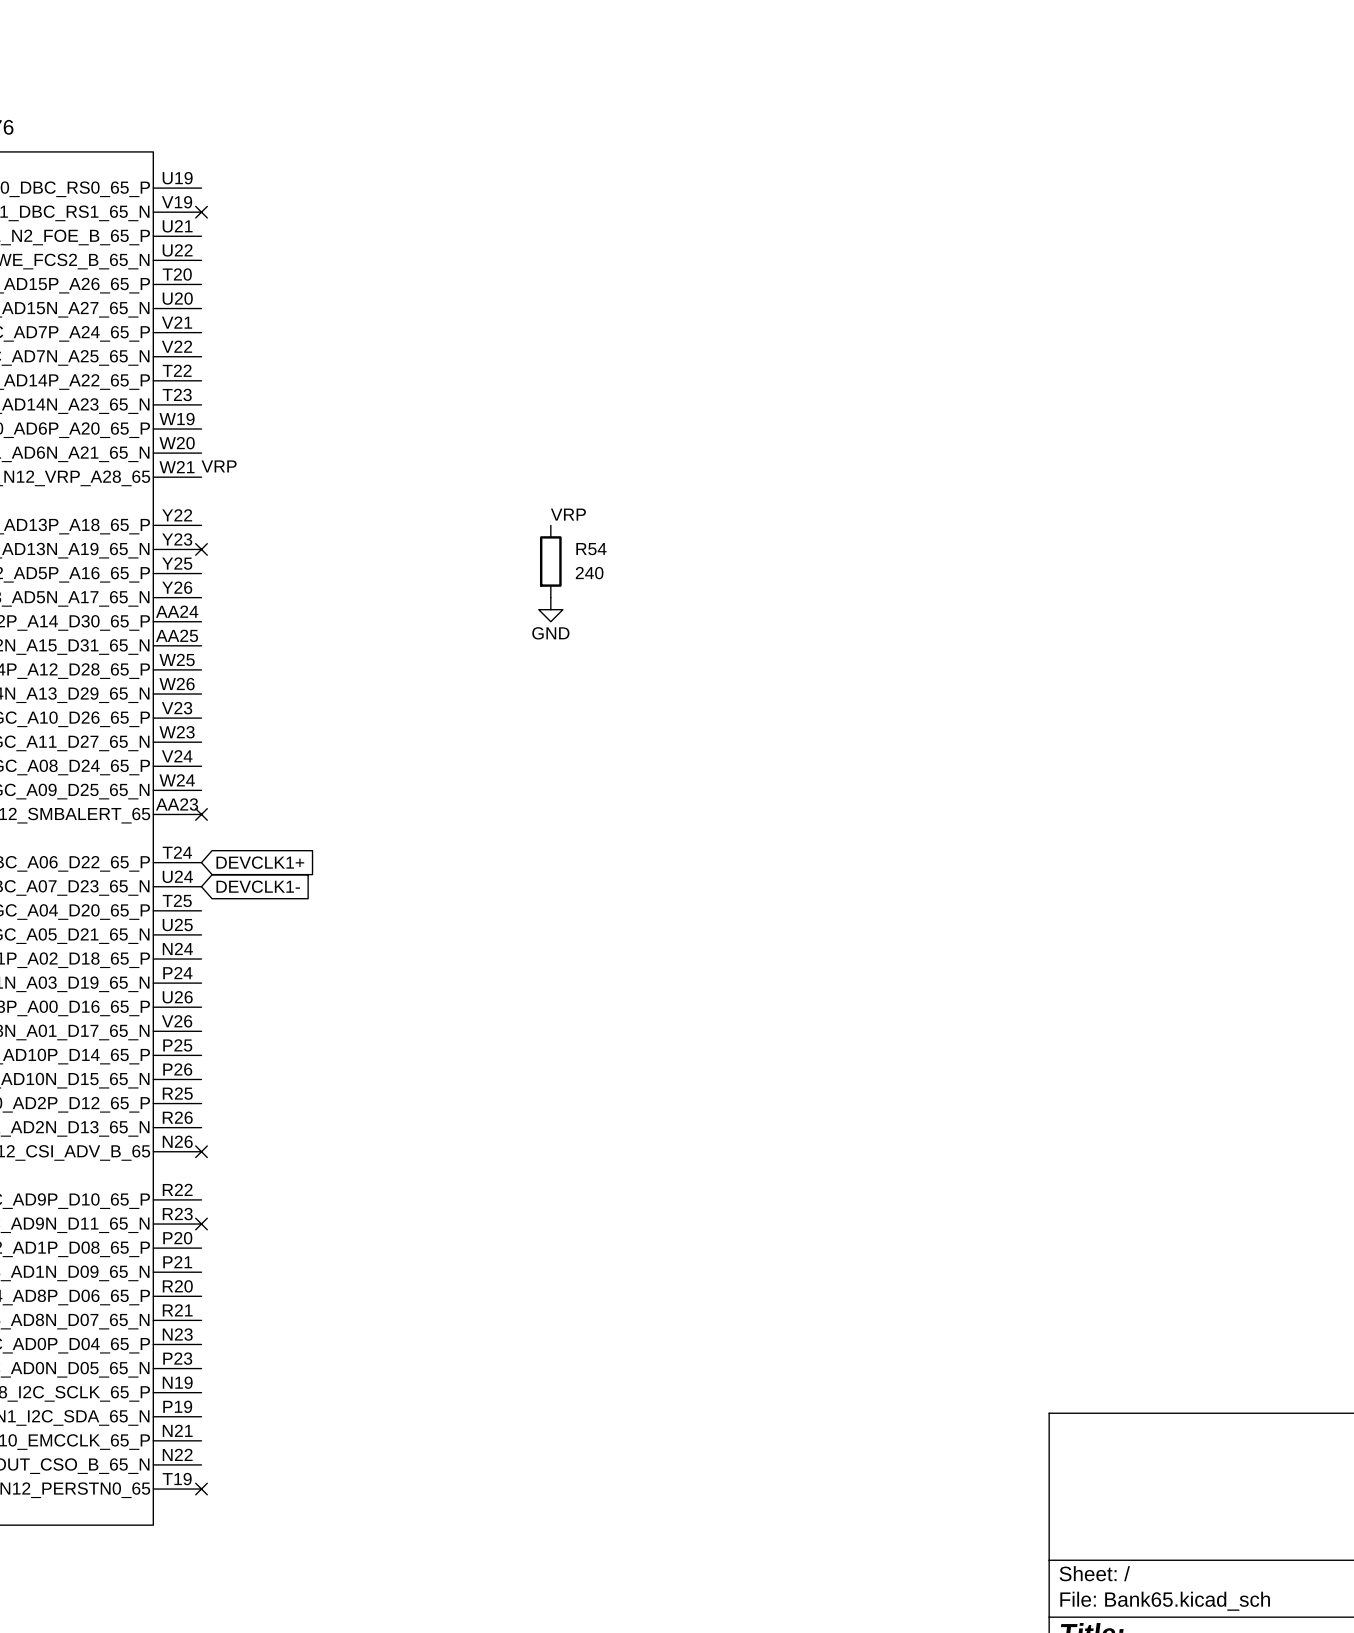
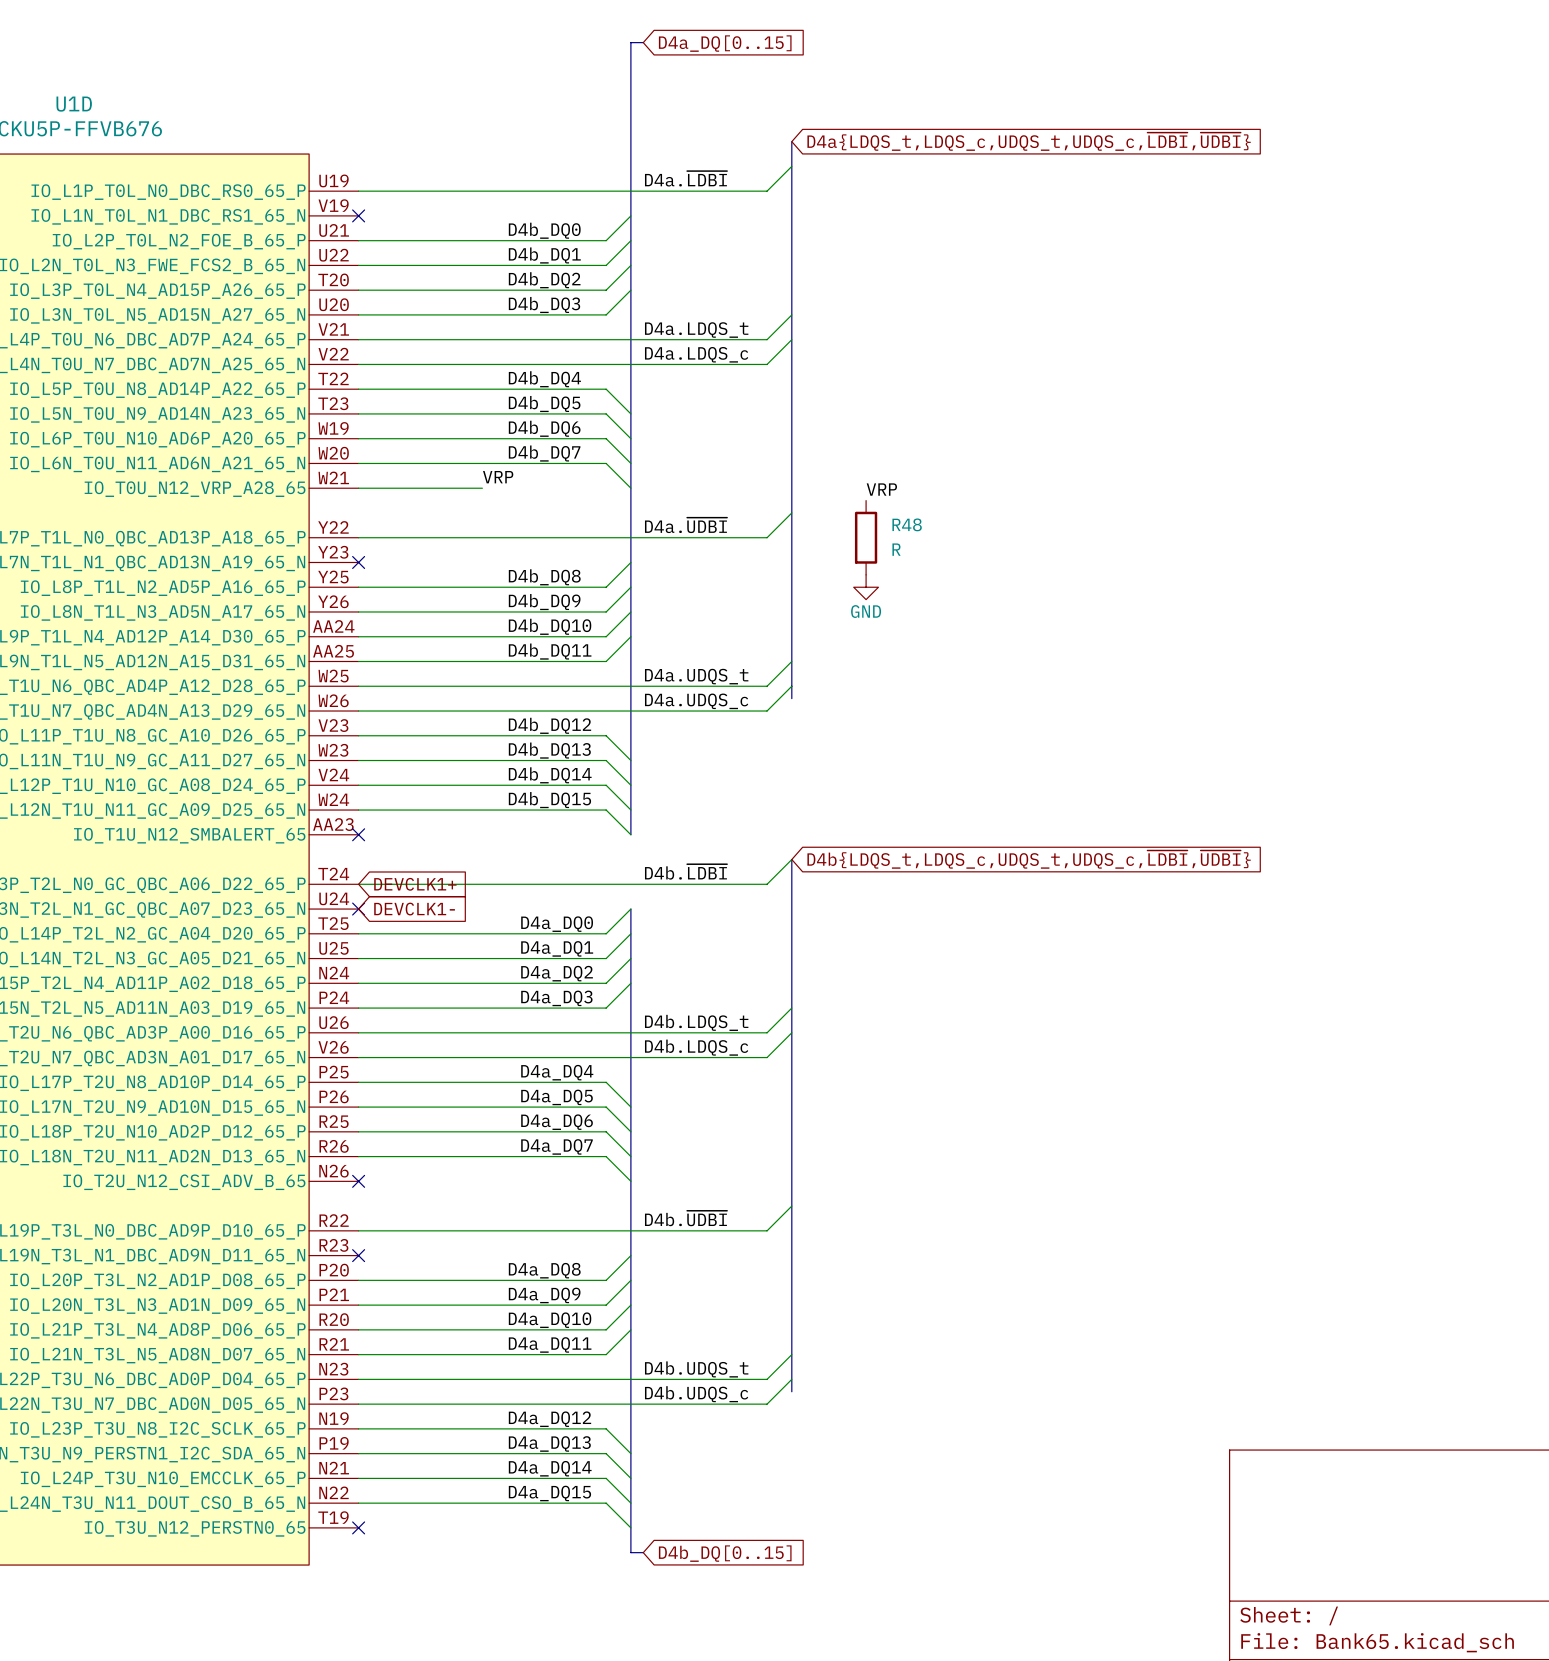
bus: none -> (643, 42) (630, 42) (630, 834)
global label: none -> D4a_DQ[0..15] (725, 43)
bus: none -> (791, 141) (791, 698)
global label: none -> D4a{LDQS_t,LDQS_c,UDQS_t,UDQS_c,~{LDBI},~{UDBI}} (1029, 141)
wire: none -> (791, 166) (767, 191) (358, 191)
label: none -> D4a.~{LDBI} (686, 178)
wire: none -> (630, 215) (606, 240) (358, 240)
label: none -> D4b_DQ0 (544, 230)
wire: none -> (630, 240) (606, 265) (358, 265)
label: none -> D4b_DQ1 (544, 255)
wire: none -> (630, 265) (606, 290) (358, 290)
label: none -> D4b_DQ2 (544, 280)
wire: none -> (630, 290) (606, 314) (358, 314)
label: none -> D4b_DQ3 (544, 305)
wire: none -> (791, 314) (767, 339) (358, 339)
label: none -> D4a.LDQS_t (696, 330)
wire: none -> (791, 339) (767, 364) (358, 364)
label: none -> D4a.LDQS_c (696, 354)
label: none -> D4b_DQ4 (544, 379)
wire: none -> (358, 389) (606, 389) (630, 413)
label: none -> D4b_DQ5 (544, 404)
wire: none -> (358, 413) (606, 413) (630, 438)
label: none -> D4b_DQ6 (544, 428)
wire: none -> (358, 438) (606, 438) (630, 463)
label: none -> D4b_DQ7 (544, 453)
wire: none -> (358, 463) (606, 463) (630, 488)
label: VRP (219, 466) -> none
label: none -> VRP (498, 477)
wire: none -> (358, 488) (482, 488)
label: none -> VRP (881, 489)
wire: none -> (791, 512) (767, 537) (358, 537)
label: none -> D4a.~{UDBI} (686, 525)
label: VRP (568, 514) -> none
R48: none -> R (866, 537)
wire: none -> (630, 562) (606, 587) (358, 587)
R54: 240 (550, 561) -> none
label: none -> D4b_DQ8 (544, 577)
wire: none -> (630, 587) (606, 611) (358, 611)
label: none -> D4b_DQ9 (544, 602)
wire: none -> (630, 611) (606, 636) (358, 636)
power symbol position: GND (550, 609) -> GND (866, 587)
label: none -> D4b_DQ10 (550, 626)
wire: none -> (630, 636) (606, 661) (358, 661)
label: none -> D4b_DQ11 (550, 651)
wire: none -> (791, 661) (767, 686) (358, 686)
label: none -> D4a.UDQS_t (696, 676)
wire: none -> (791, 686) (767, 711) (358, 711)
label: none -> D4a.UDQS_c (696, 701)
label: none -> D4b_DQ12 (549, 725)
wire: none -> (358, 735) (606, 735) (630, 760)
label: none -> D4b_DQ13 (549, 750)
wire: none -> (358, 760) (606, 760) (630, 785)
label: none -> D4b_DQ14 (550, 775)
wire: none -> (358, 785) (606, 785) (630, 810)
label: none -> D4b_DQ15 (549, 800)
wire: none -> (358, 810) (606, 810) (630, 834)
wire: none -> (791, 859) (767, 884) (358, 884)
bus: none -> (791, 859) (791, 1391)
global label: none -> D4b{LDQS_t,LDQS_c,UDQS_t,UDQS_c,~{LDBI},~{UDBI}} (1029, 859)
label: none -> D4b.~{LDBI} (686, 871)
no-connect mark: none -> (358, 909)
wire: none -> (630, 909) (606, 933) (358, 933)
bus: none -> (630, 909) (630, 1552) (643, 1552)
label: none -> D4a_DQ0 (557, 924)
wire: none -> (630, 933) (606, 958) (358, 958)
label: none -> D4a_DQ1 (557, 948)
wire: none -> (630, 958) (606, 983) (358, 983)
label: none -> D4a_DQ2 (557, 973)
wire: none -> (630, 983) (606, 1008) (358, 1008)
label: none -> D4a_DQ3 (556, 998)
wire: none -> (791, 1008) (767, 1032) (358, 1032)
label: none -> D4b.LDQS_t (696, 1022)
wire: none -> (791, 1032) (767, 1057) (358, 1057)
label: none -> D4b.LDQS_c (696, 1047)
label: none -> D4a_DQ4 (557, 1072)
wire: none -> (358, 1082) (606, 1082) (630, 1107)
label: none -> D4a_DQ5 (557, 1097)
wire: none -> (358, 1107) (606, 1107) (630, 1131)
label: none -> D4a_DQ6 (557, 1122)
wire: none -> (358, 1131) (606, 1131) (630, 1156)
label: none -> D4a_DQ7 (556, 1146)
wire: none -> (358, 1156) (606, 1156) (630, 1181)
wire: none -> (791, 1206) (767, 1230) (358, 1230)
label: none -> D4b.~{UDBI} (686, 1218)
wire: none -> (630, 1255) (606, 1280) (358, 1280)
label: none -> D4a_DQ8 (544, 1270)
wire: none -> (630, 1280) (606, 1305) (358, 1305)
label: none -> D4a_DQ9 (544, 1295)
wire: none -> (630, 1305) (606, 1329) (358, 1329)
label: none -> D4a_DQ10 (550, 1320)
wire: none -> (630, 1329) (606, 1354) (358, 1354)
label: none -> D4a_DQ11 (550, 1344)
wire: none -> (791, 1354) (767, 1379) (358, 1379)
label: none -> D4b.UDQS_t (696, 1369)
wire: none -> (791, 1379) (767, 1404) (358, 1404)
label: none -> D4b.UDQS_c (696, 1394)
label: none -> D4a_DQ12 (549, 1419)
wire: none -> (358, 1428) (606, 1428) (630, 1453)
label: none -> D4a_DQ13 (549, 1443)
wire: none -> (358, 1453) (606, 1453) (630, 1478)
label: none -> D4a_DQ14 (550, 1468)
wire: none -> (358, 1478) (606, 1478) (630, 1503)
label: none -> D4a_DQ15 (549, 1493)
wire: none -> (358, 1503) (606, 1503) (630, 1527)
global label: none -> D4b_DQ[0..15] (725, 1553)

